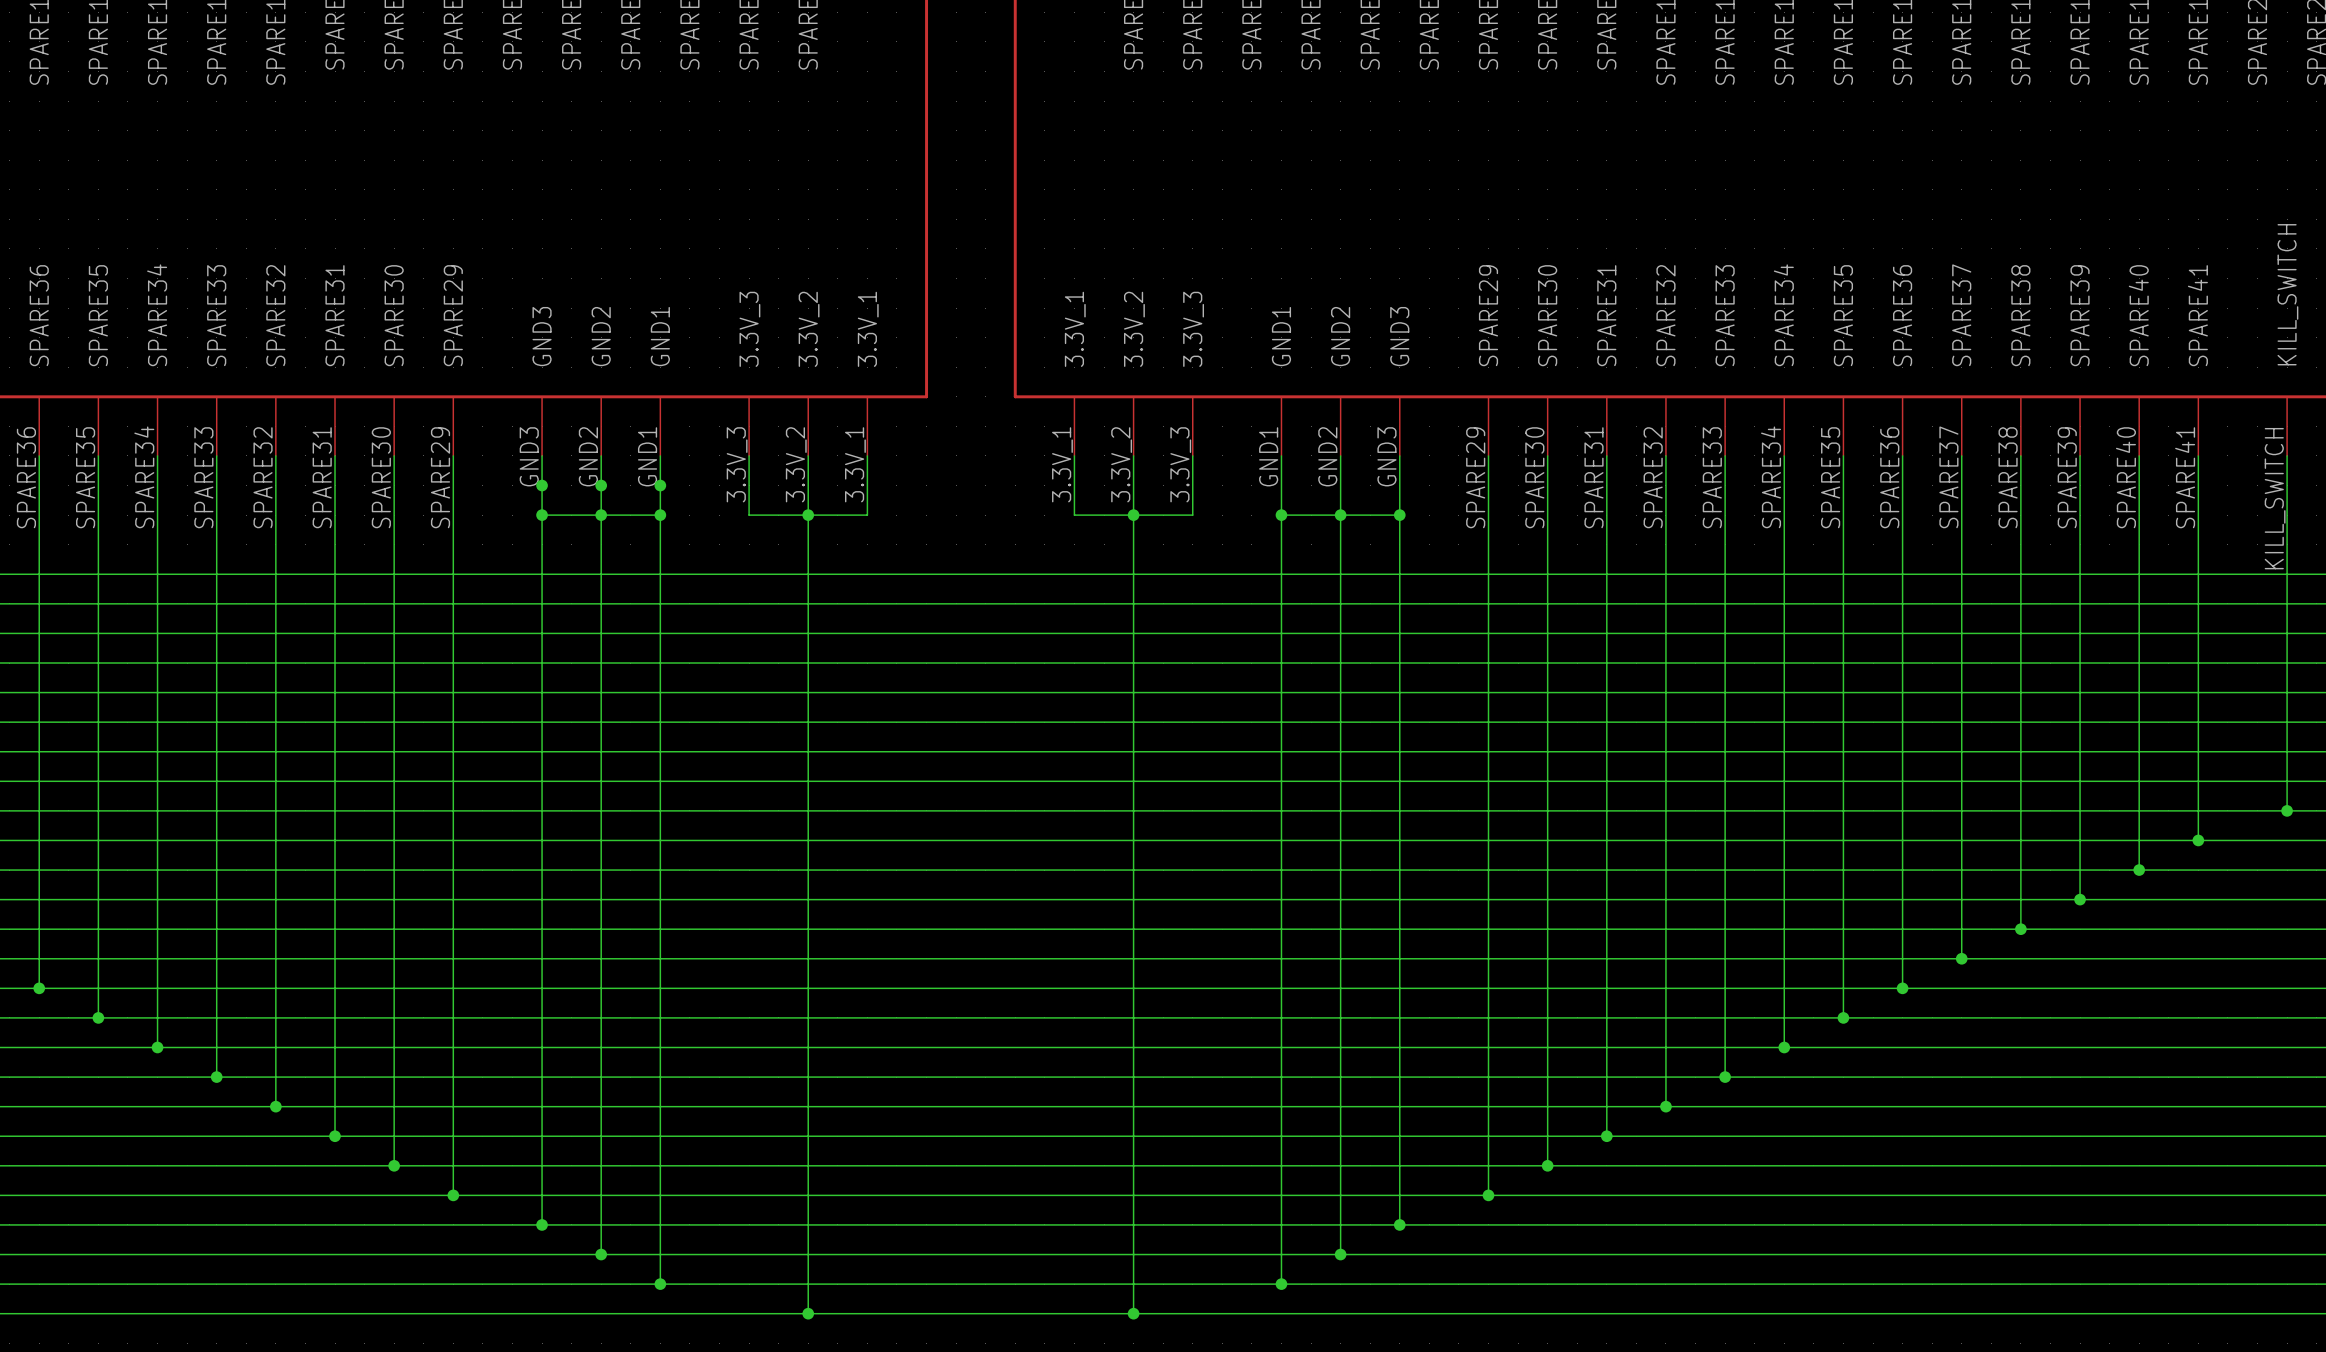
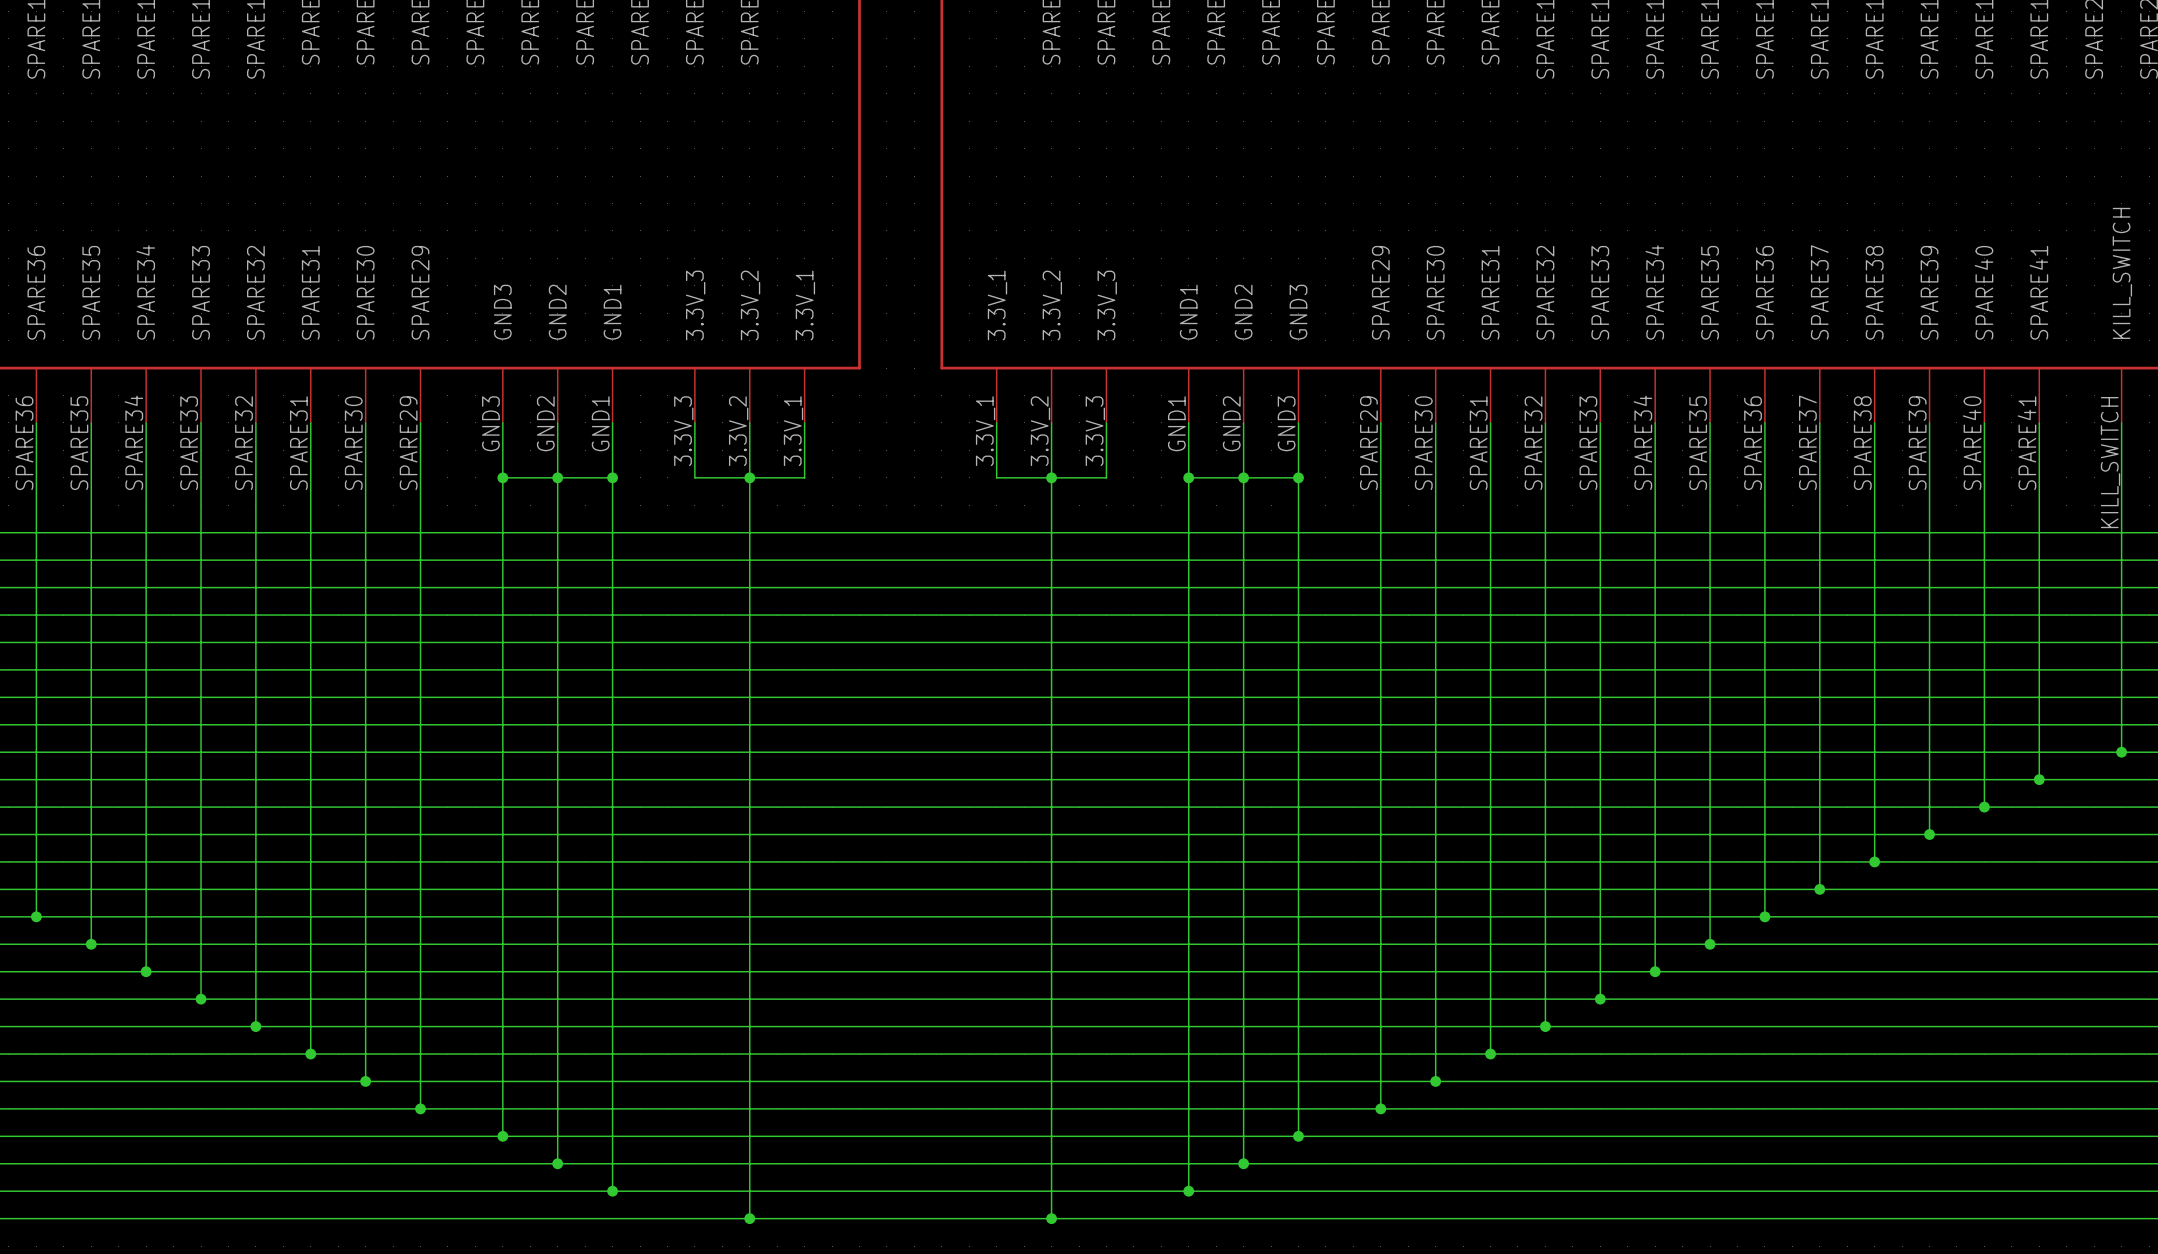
junction: (542, 485) -> none
junction: (601, 485) -> none
junction: (660, 485) -> none

